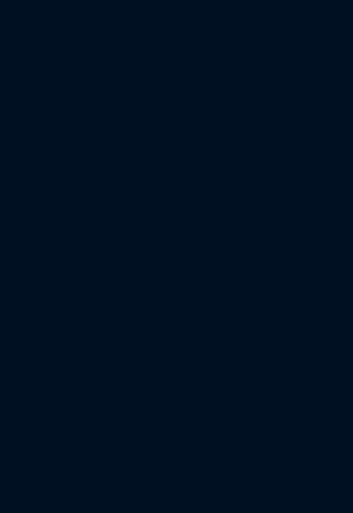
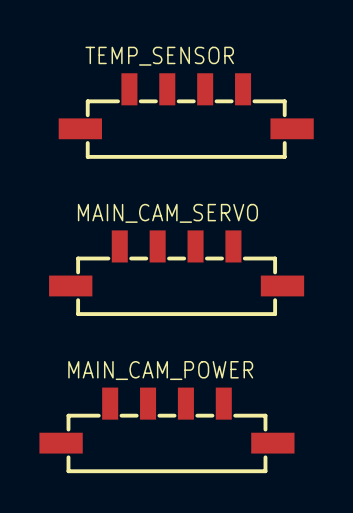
TEMP_SENSOR: none -> (186, 116)
MAIN_CAM_SERVO: none -> (176, 273)
MAIN_CAM_POWER: none -> (166, 430)

